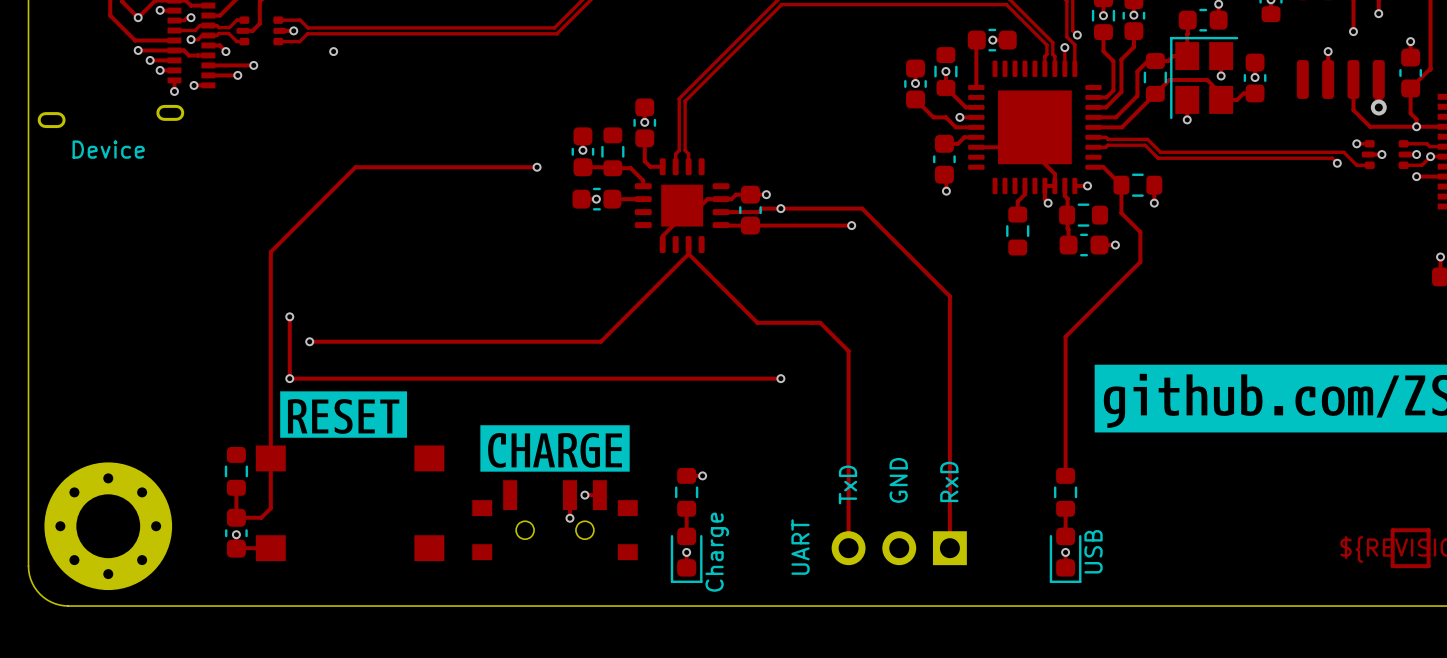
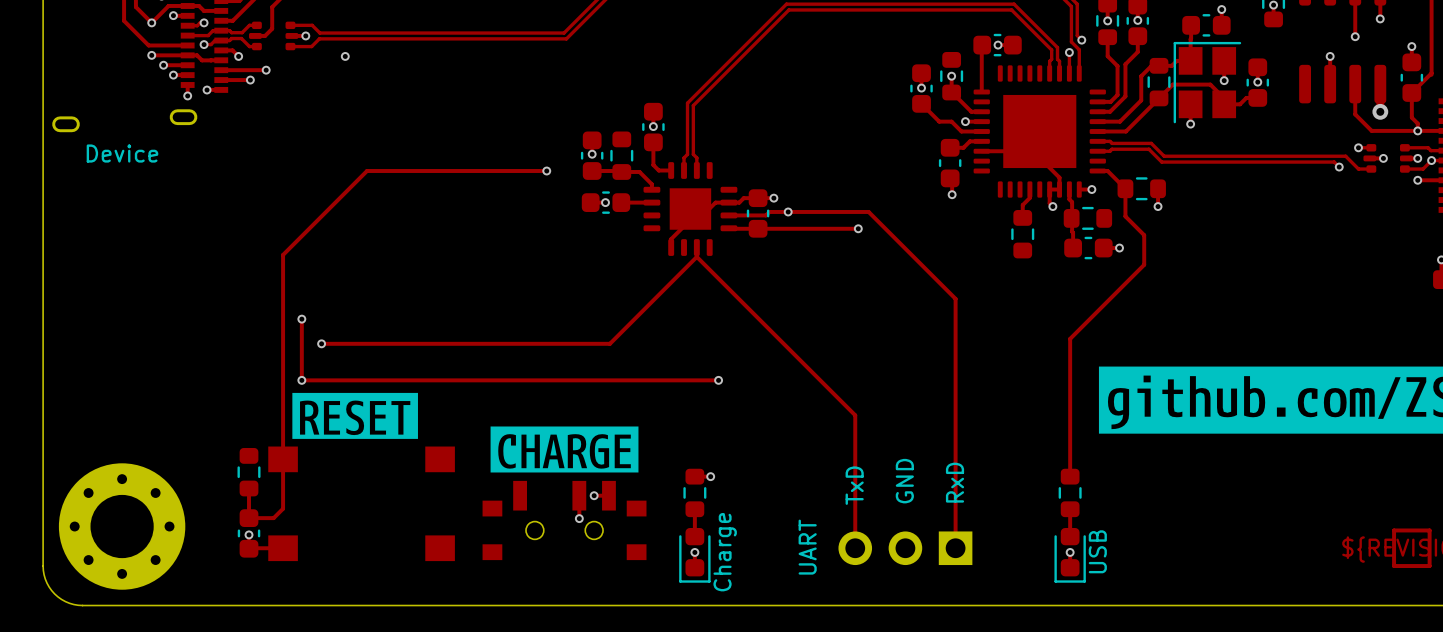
track: (757, 322) (820, 322) (848, 351) (848, 413) -> (764, 325) (855, 415)
track: (710, 378) (780, 378) -> none
via position: (780, 378) -> (718, 380)

